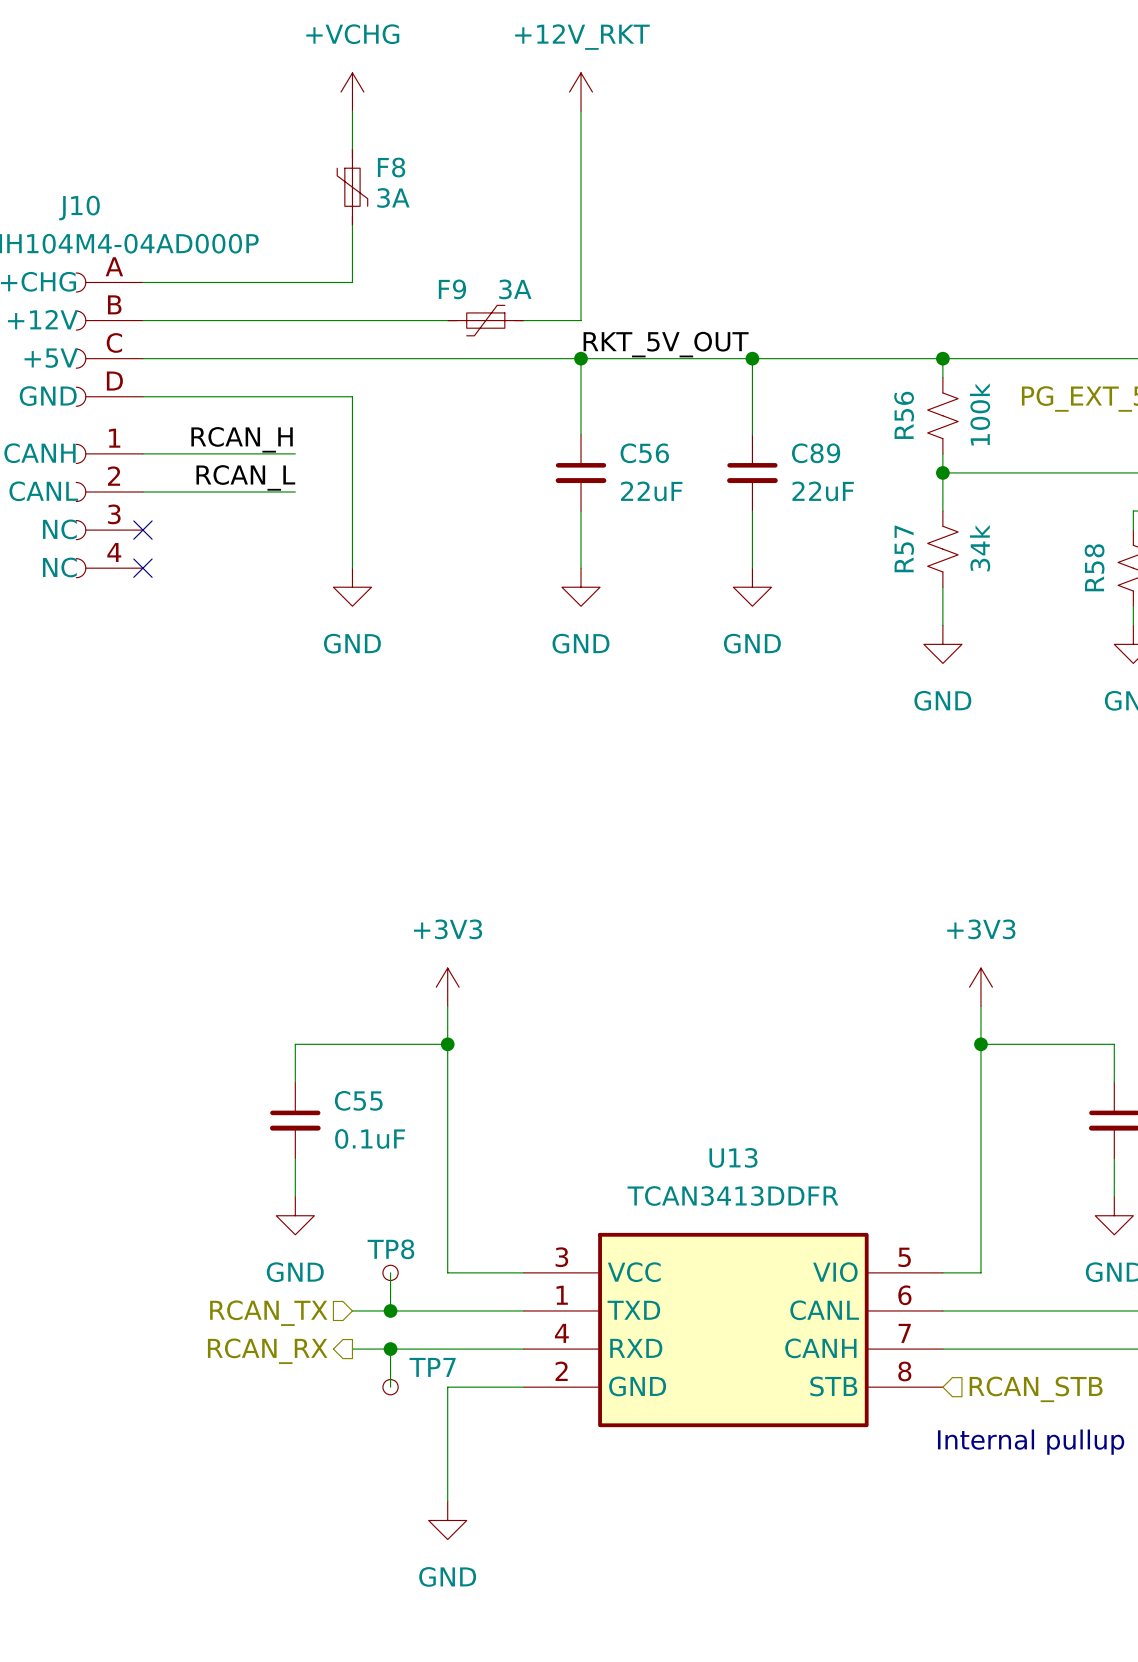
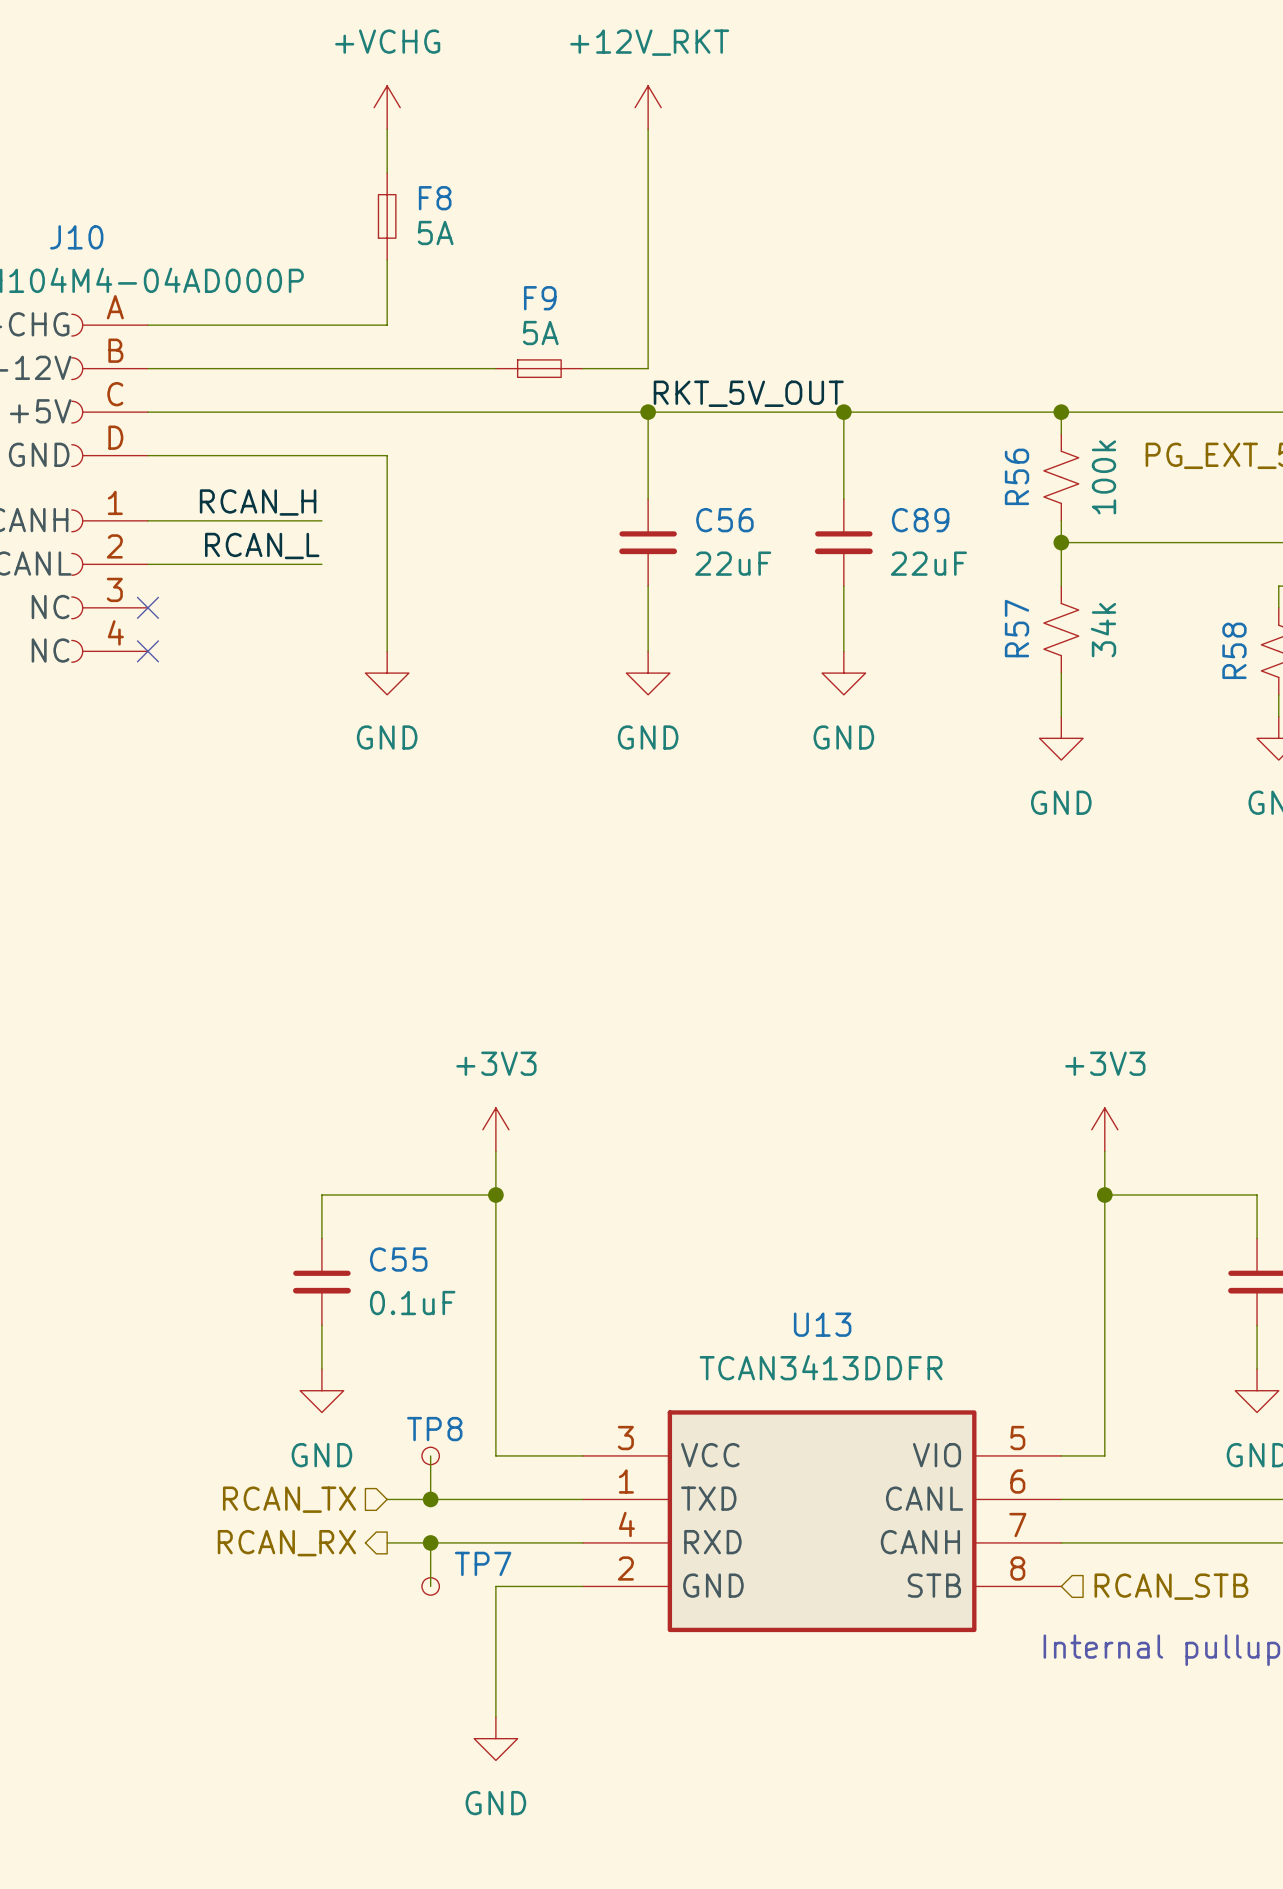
F8 symbol: [337, 149, 368, 226] -> [378, 172, 396, 260]
F8 value: 3A (393, 197) -> 5A (435, 232)
F9 name position: F9 (452, 289) -> F9 (540, 298)
F9 value: 3A (515, 289) -> 5A (540, 333)
F9 symbol: [447, 305, 524, 336] -> [495, 359, 583, 378]

